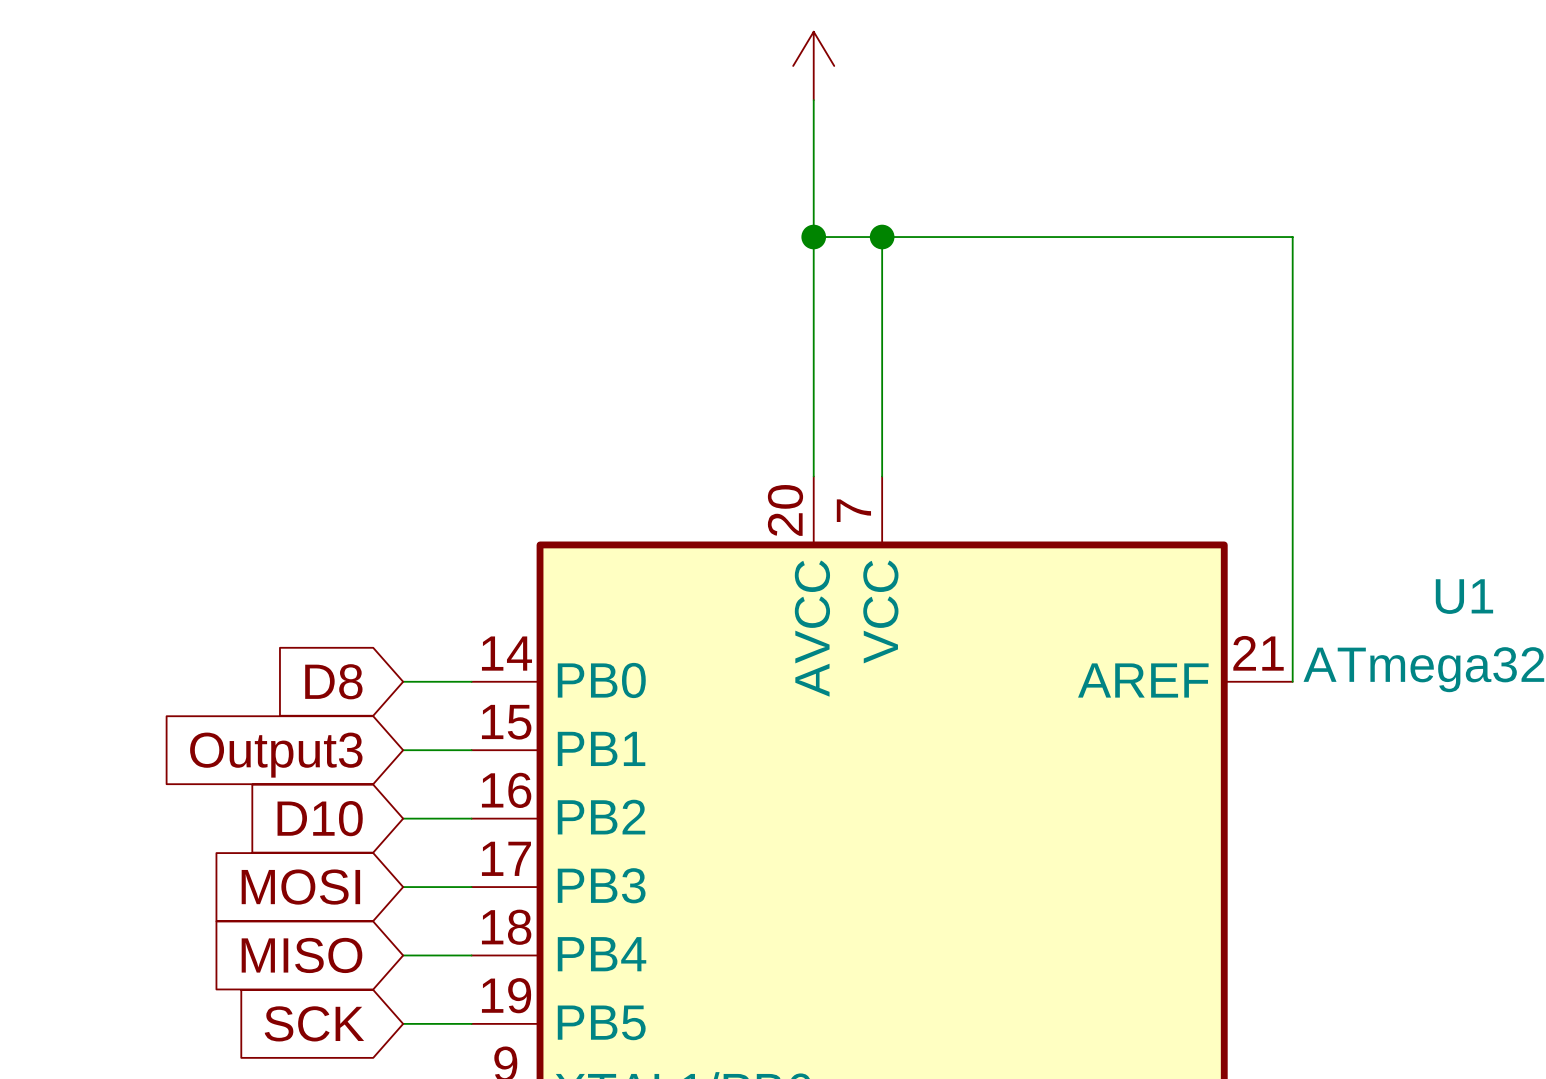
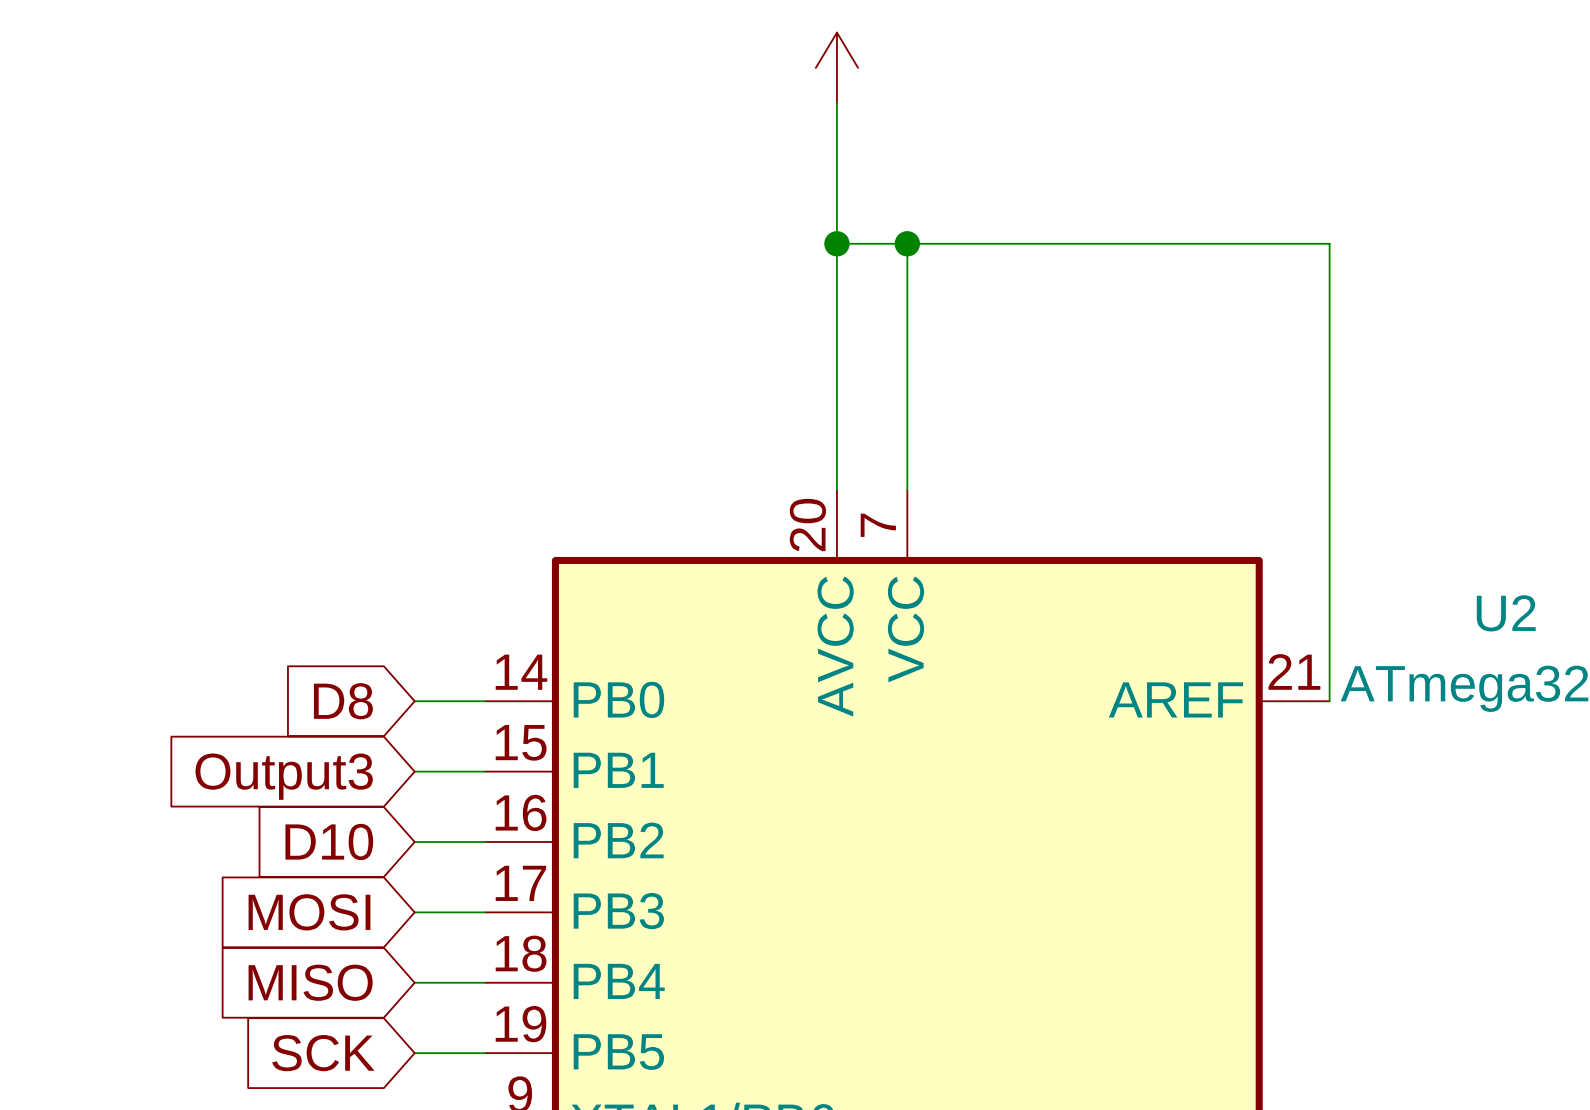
U1 name: U1 (1464, 596) -> U2 (1506, 613)

